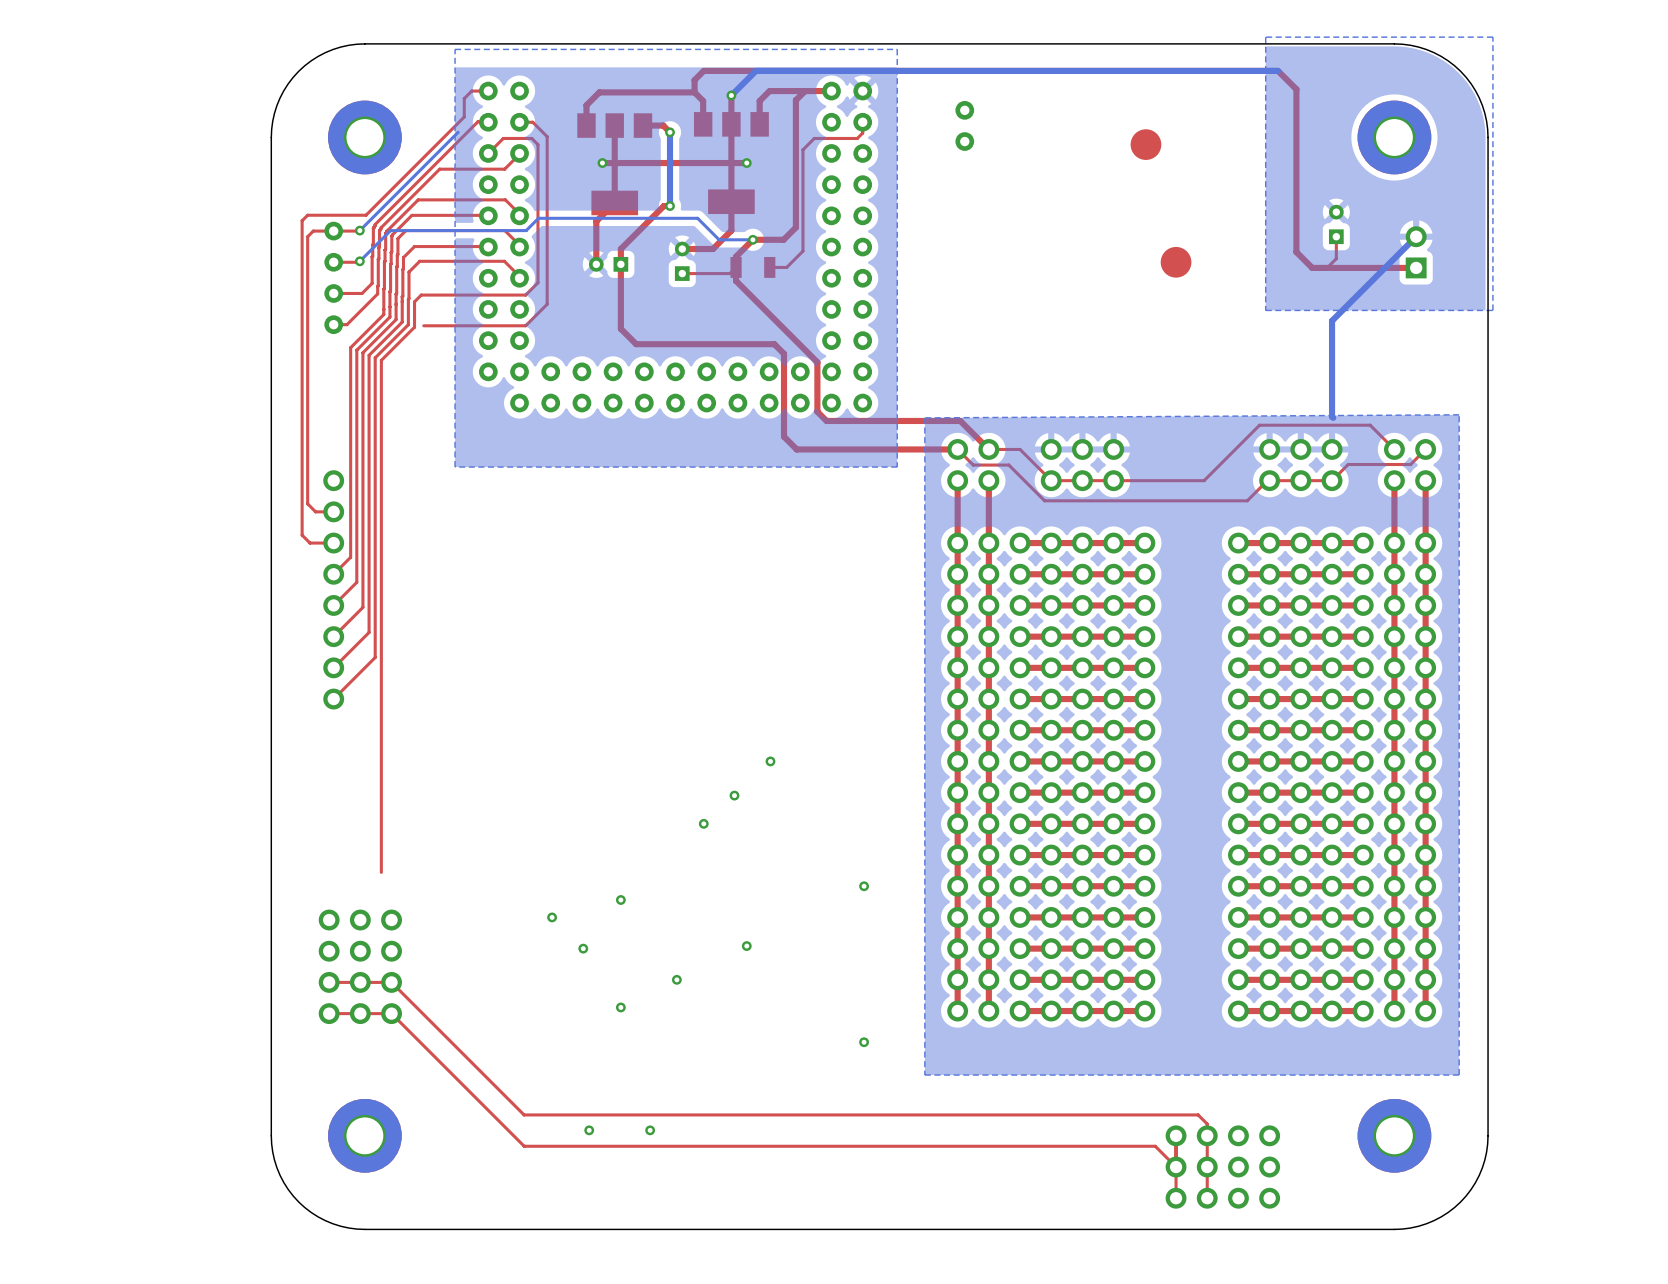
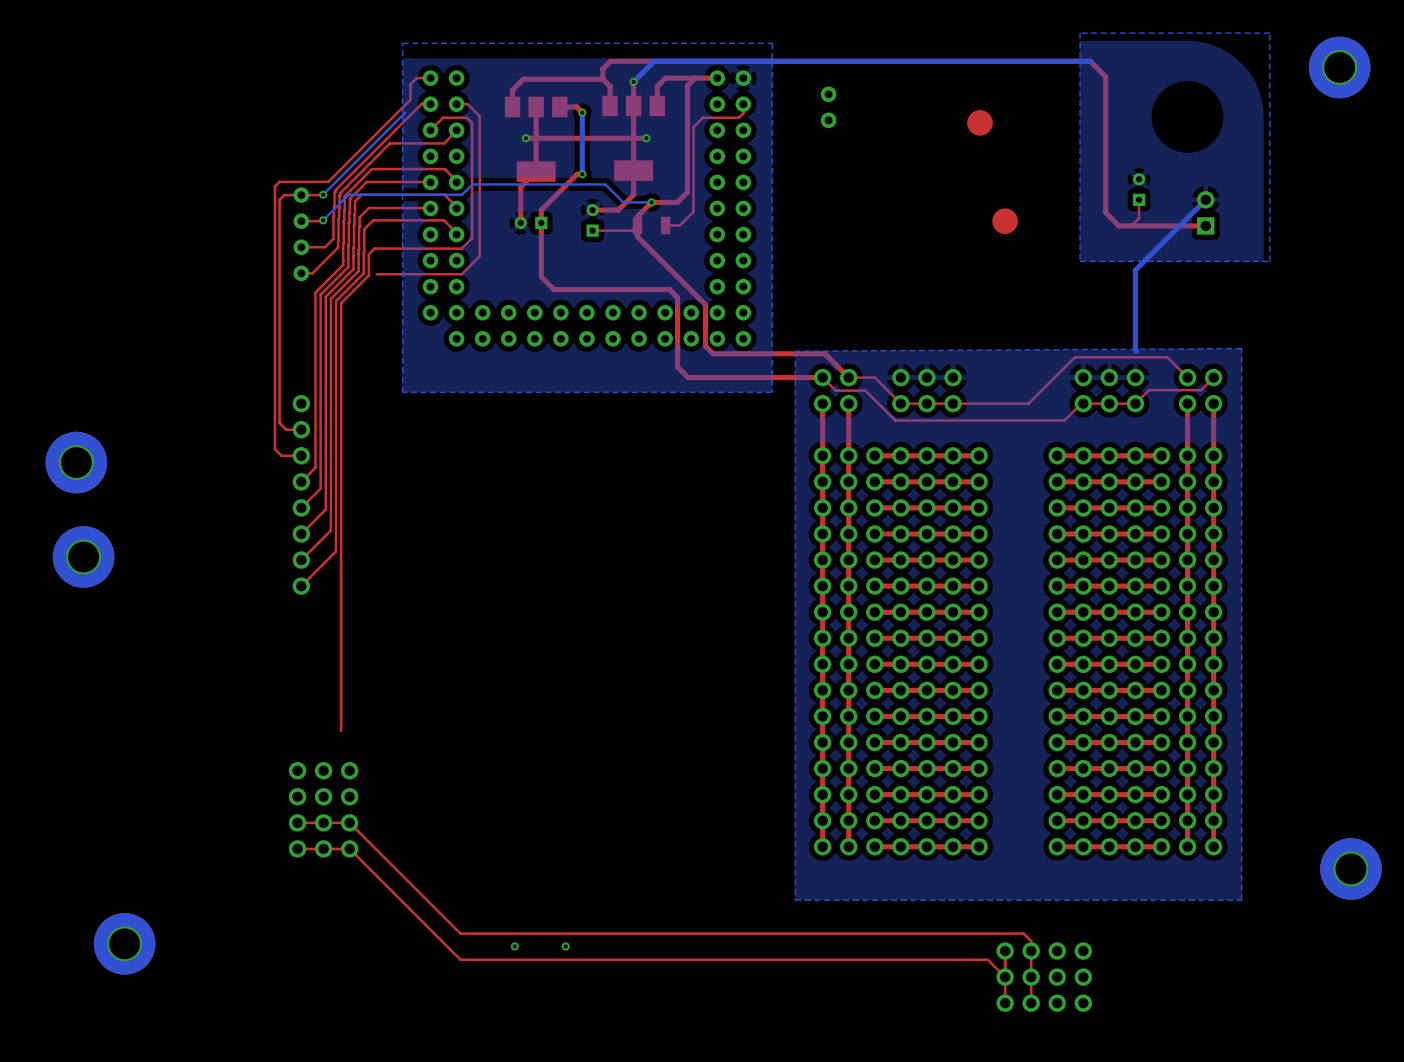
board edge: (1394, 43) (364, 43) (340, 47) (325, 52) (298, 71) (283, 90) (276, 105) (271, 137) (271, 1135) (276, 1167) (283, 1182) (298, 1202) (311, 1212) (332, 1223) (364, 1229) (1394, 1229) (1410, 1227) (1433, 1220) (1460, 1202) (1479, 1175) (1484, 1160) (1488, 1135) (1487, 129) (1482, 105) (1475, 90) (1454, 65) (1426, 49) (1394, 43) -> none
part: (364, 137) -> none
part position: (1394, 137) -> (1339, 67)
part: none -> (76, 462)
part: none -> (83, 556)
via: (770, 761) -> none
via: (734, 795) -> none
via: (703, 823) -> none
via: (864, 886) -> none
via: (620, 899) -> none
via: (552, 917) -> none
via: (746, 946) -> none
via: (583, 948) -> none
via: (676, 979) -> none
via: (620, 1007) -> none
via: (864, 1042) -> none
part position: (364, 1135) -> (124, 943)
part position: (1394, 1135) -> (1350, 868)

